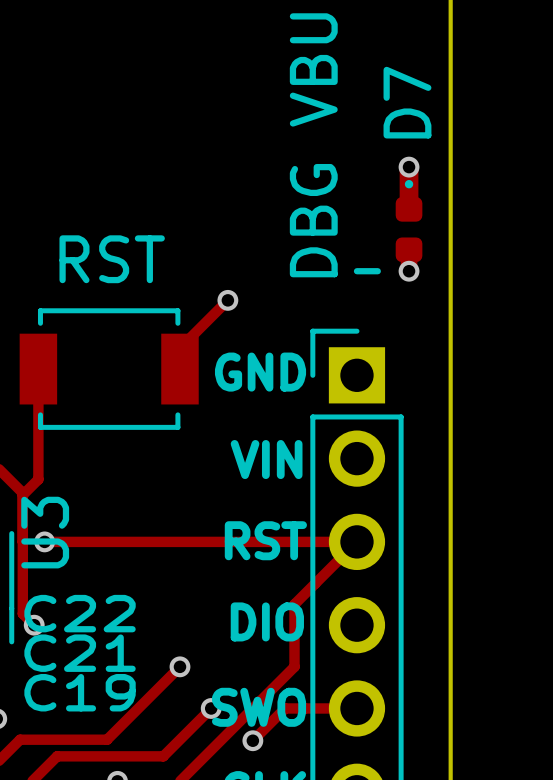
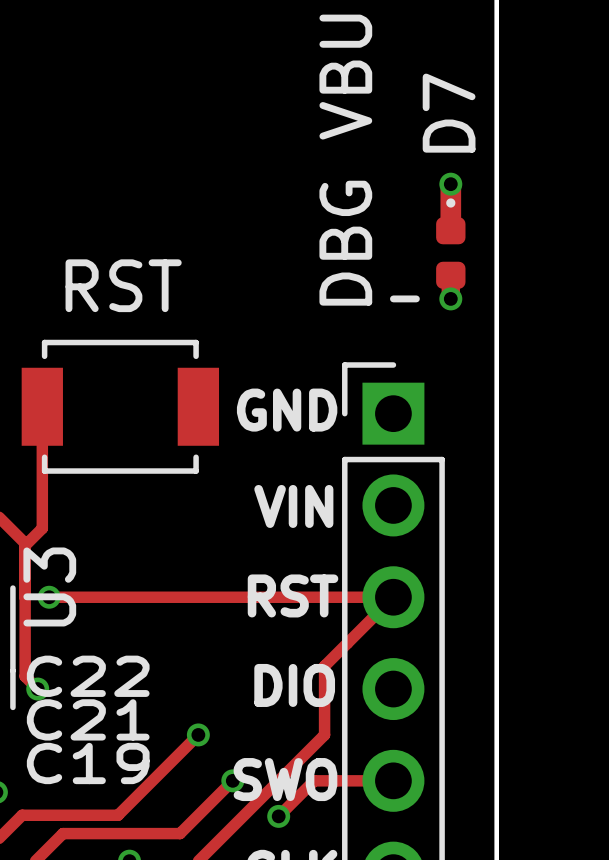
track: (227, 300) (179, 348) (179, 369) -> none
via: (227, 300) -> none

